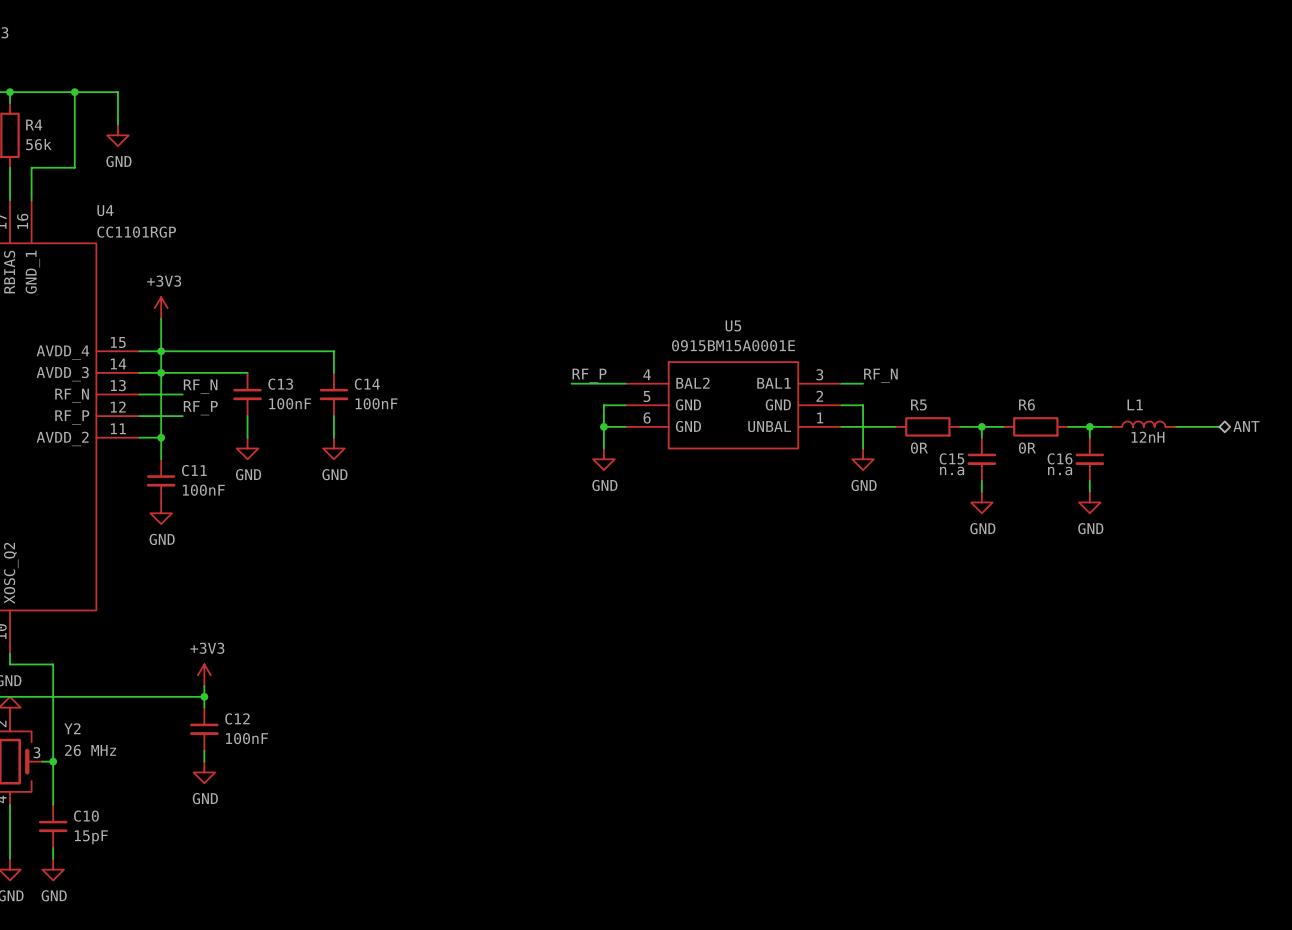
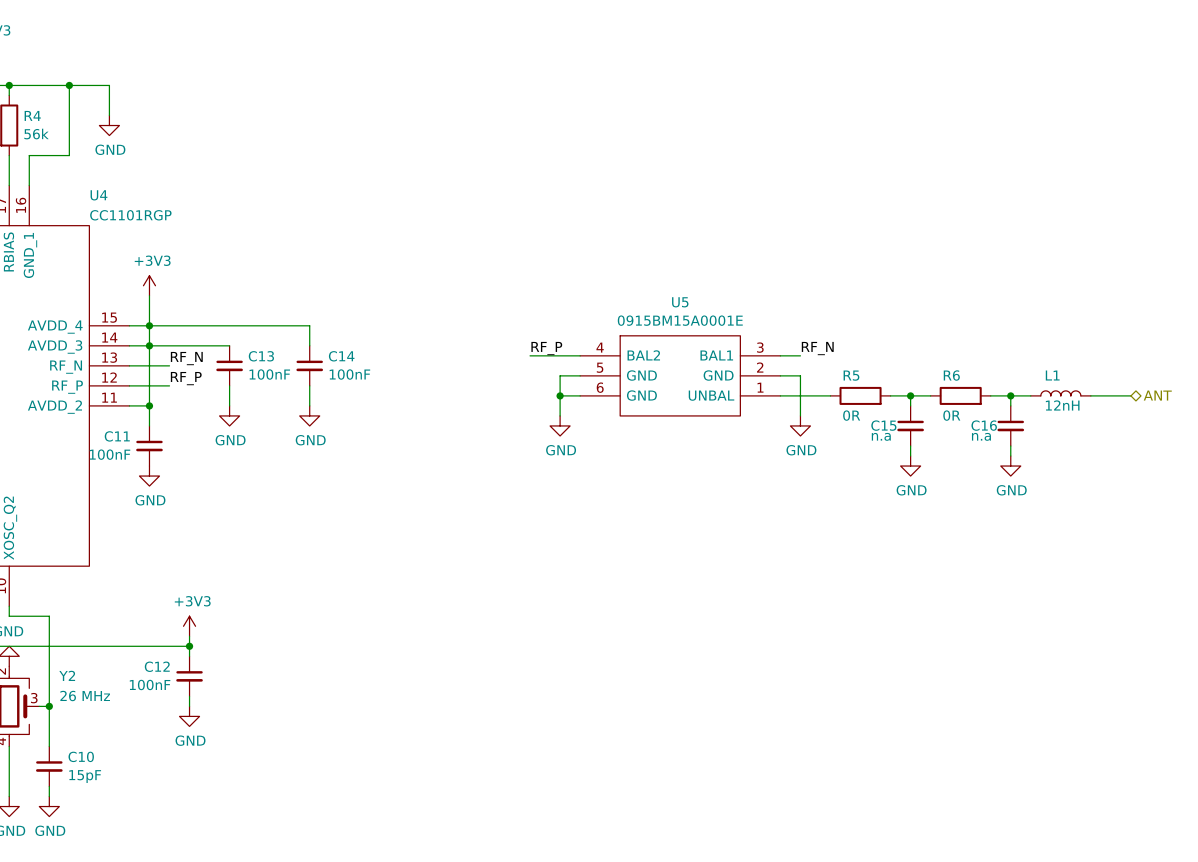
C11 name position: C11 (194, 470) -> C11 (117, 436)
C11 value position: 100nF (203, 490) -> 100nF (109, 454)
C12 name position: C12 (237, 718) -> C12 (157, 666)
C12 value position: 100nF (246, 738) -> 100nF (150, 684)

